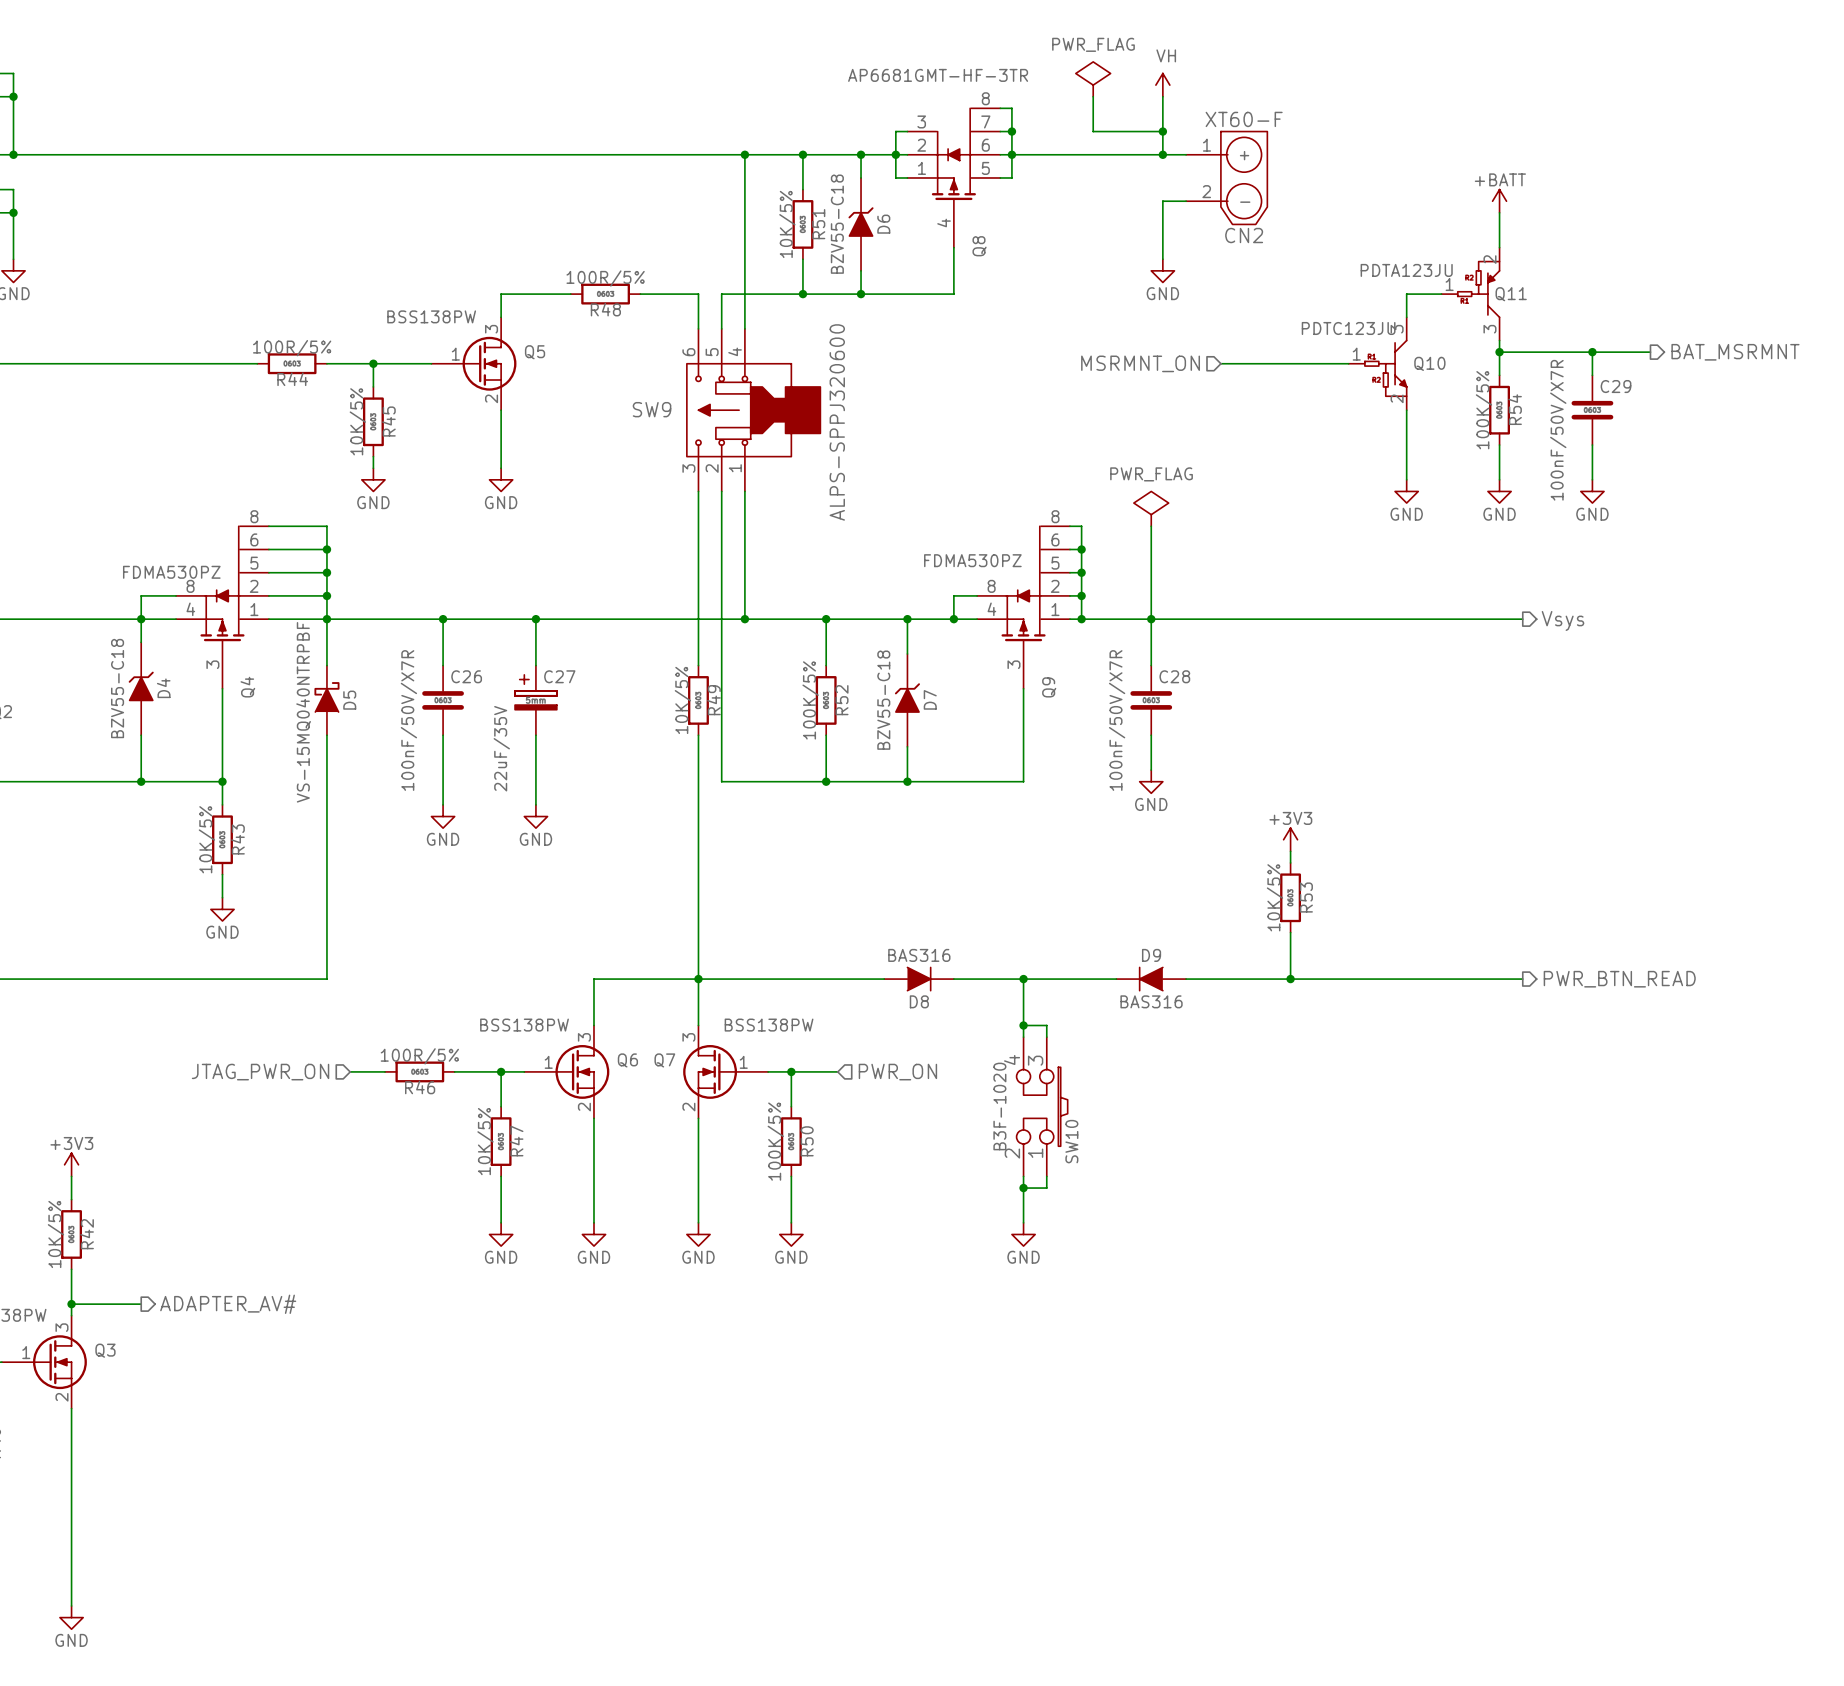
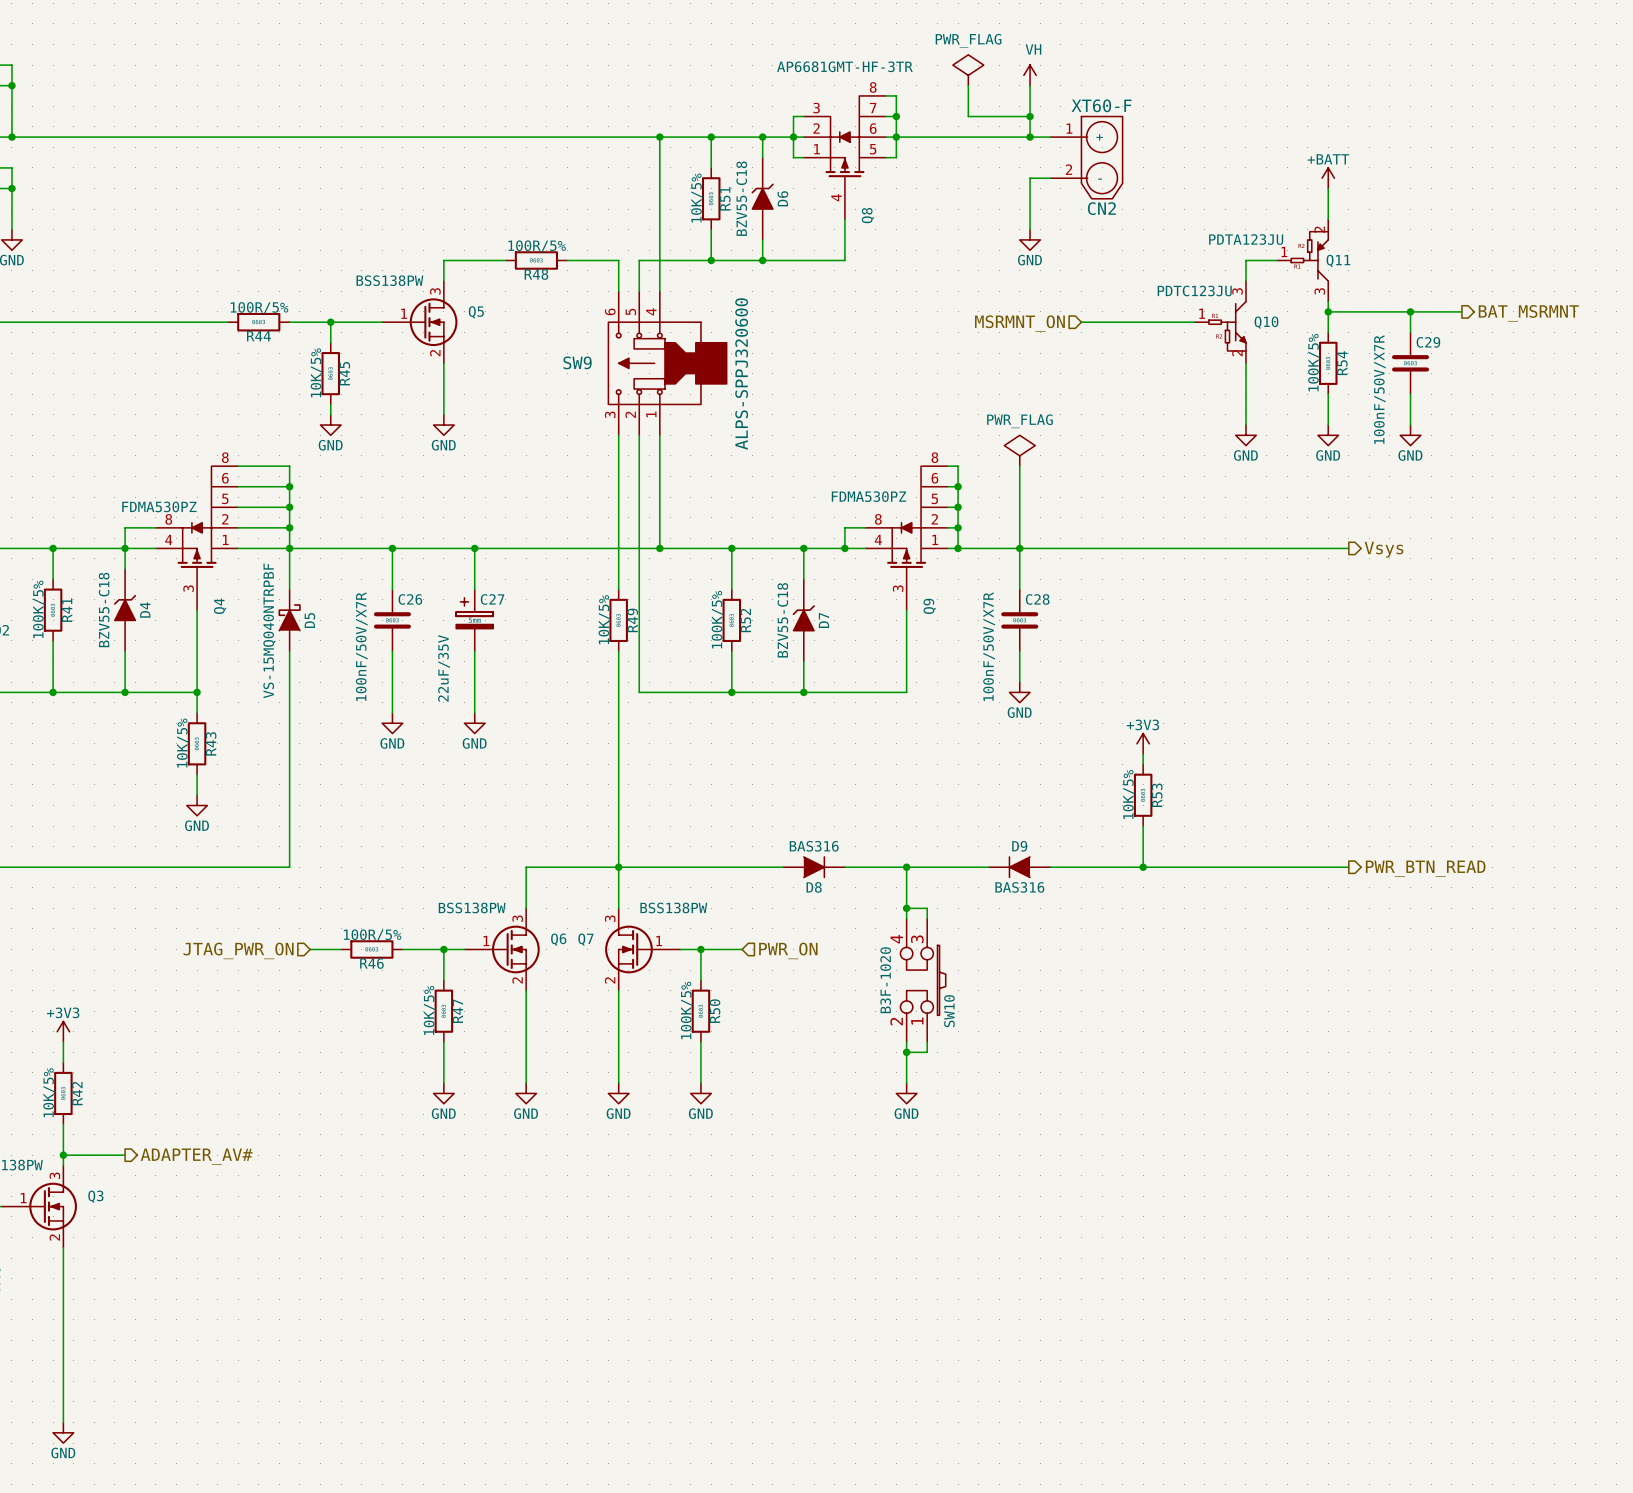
wire: none -> (53, 548) (53, 579)
junction: none -> (53, 548)
R41: none -> 100K/5% (53, 610)
wire: none -> (53, 640) (53, 692)
junction: none -> (53, 692)

